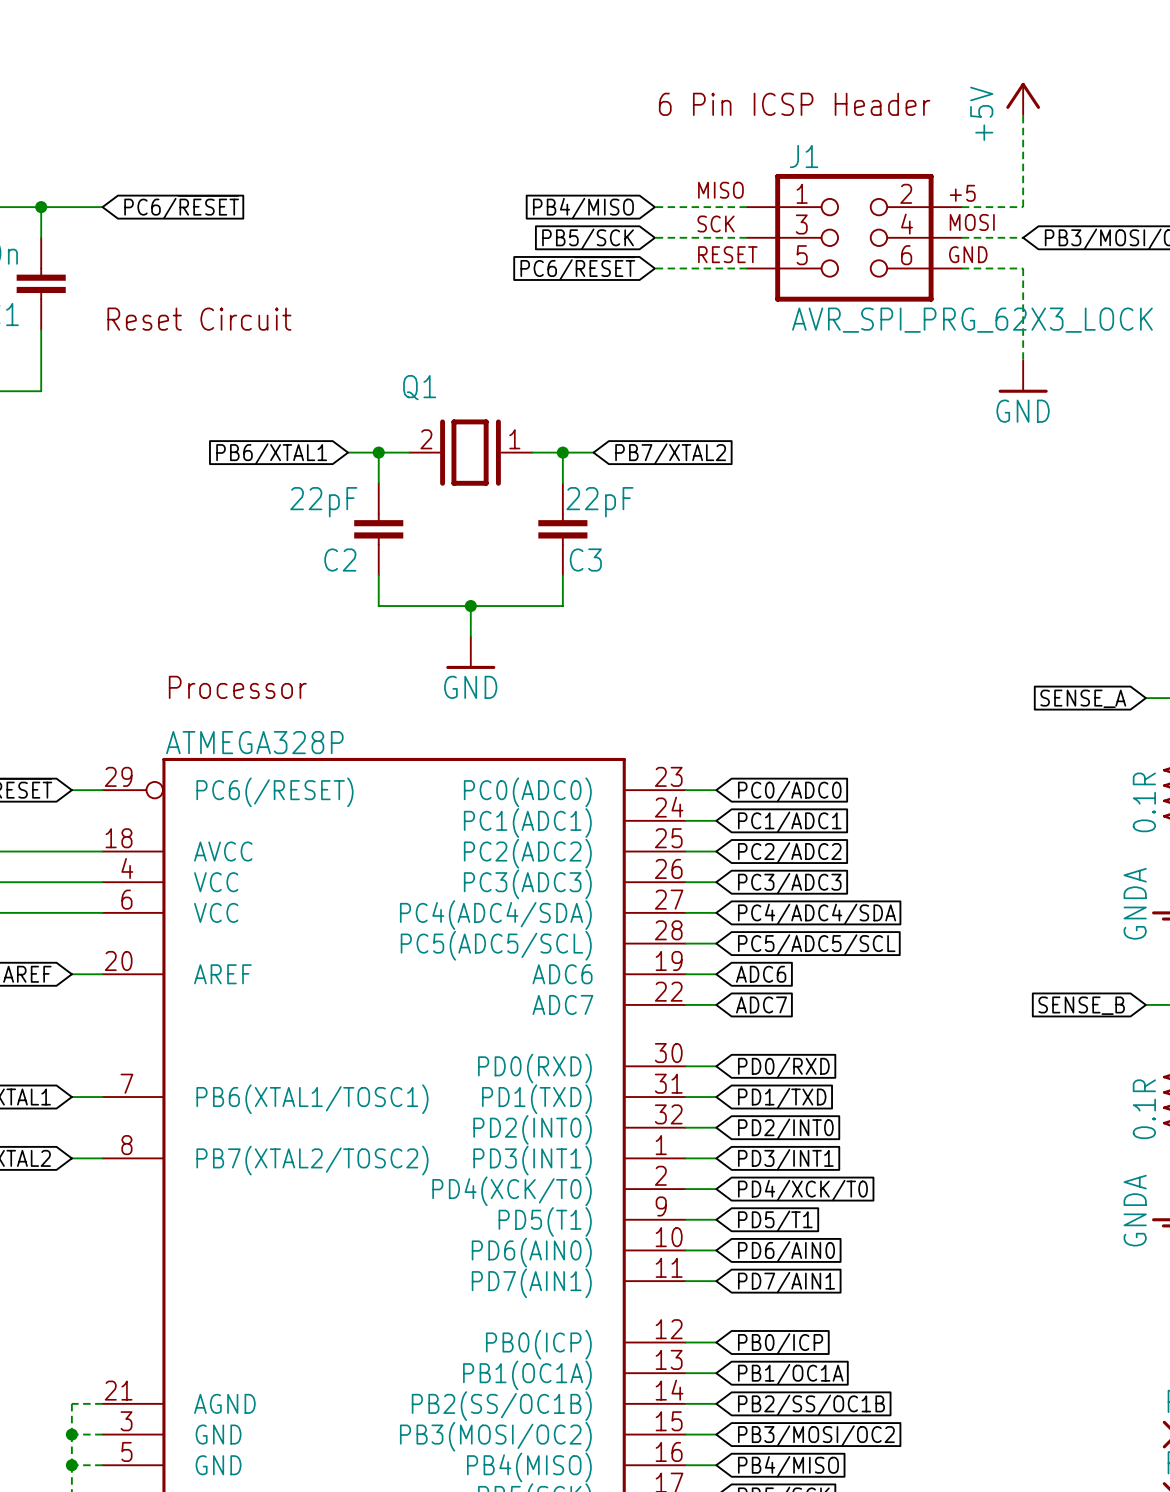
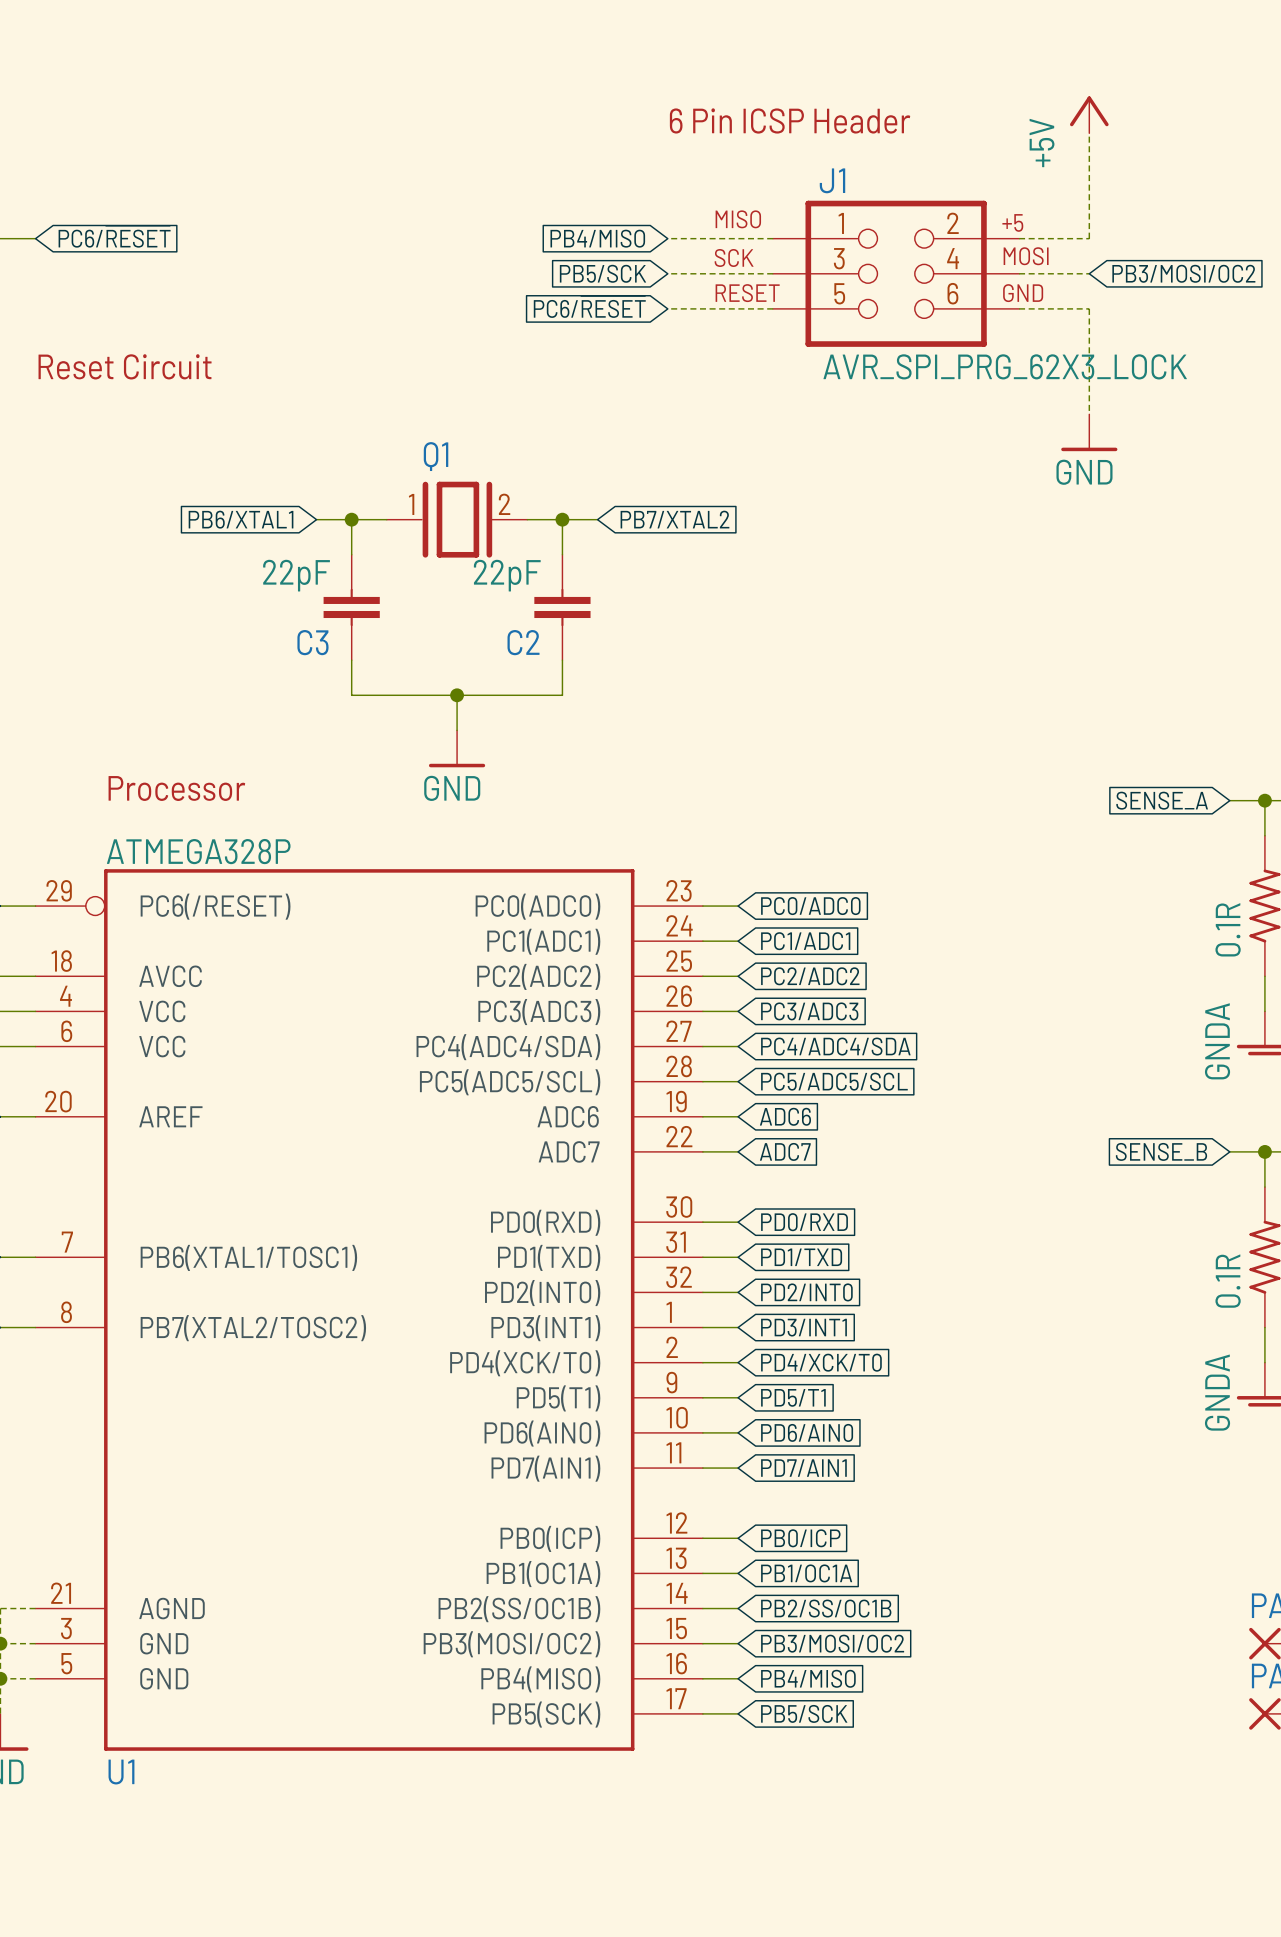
Q1 name position: Q1 (419, 387) -> Q1 (436, 456)
Q1 rotation: 0° (470, 452) -> 180° (457, 519)
C3 value position: 22pF (599, 502) -> 22pF (507, 575)
C2 name: C2 (340, 560) -> C3 (312, 642)
C3 name: C3 (585, 560) -> C2 (523, 642)

